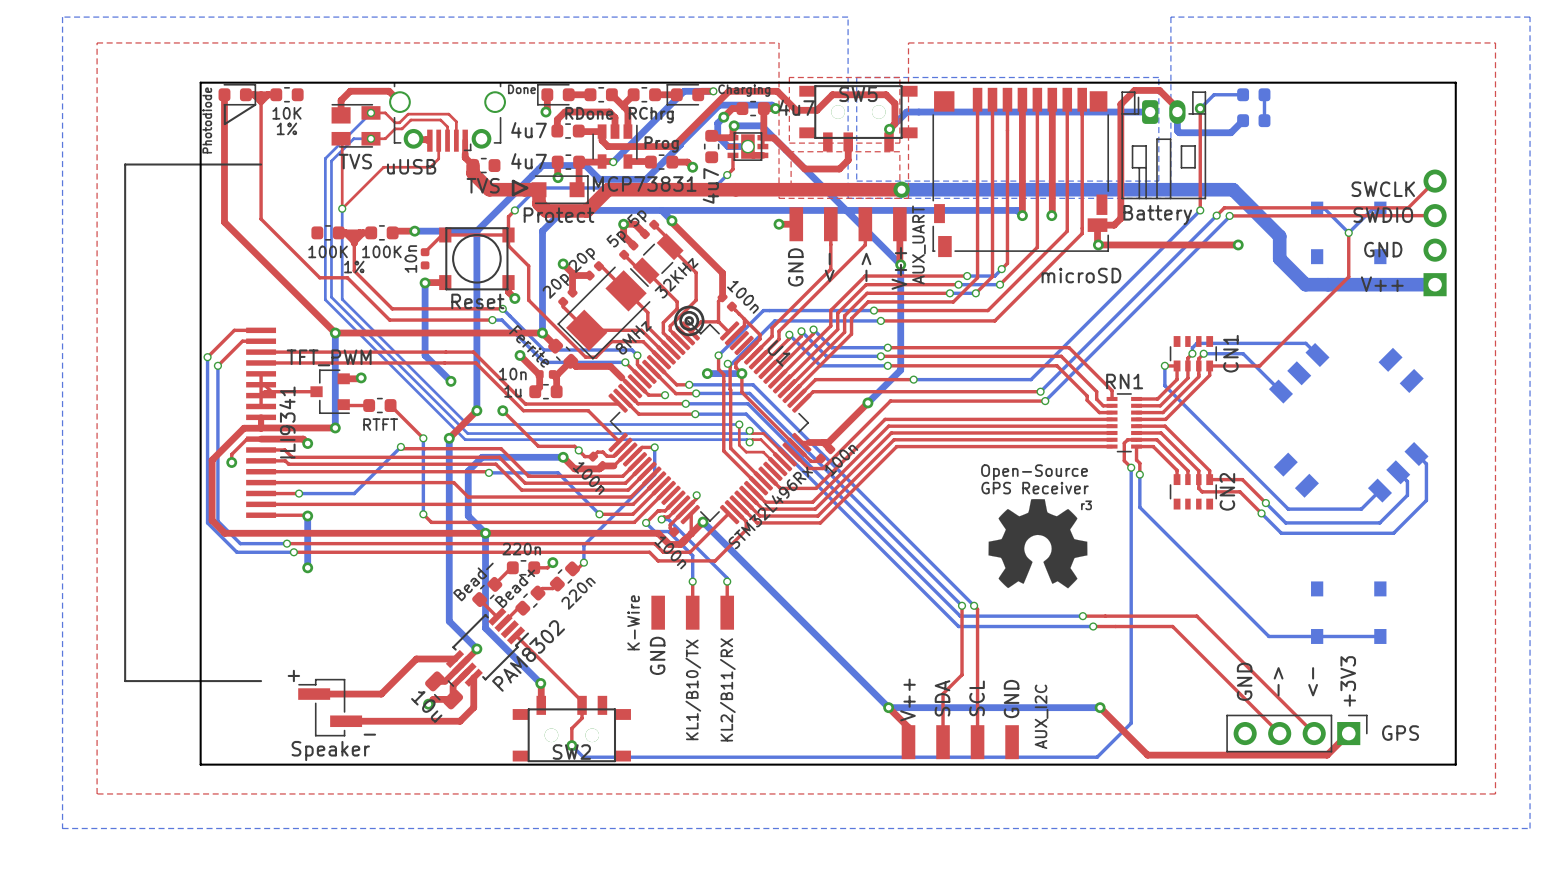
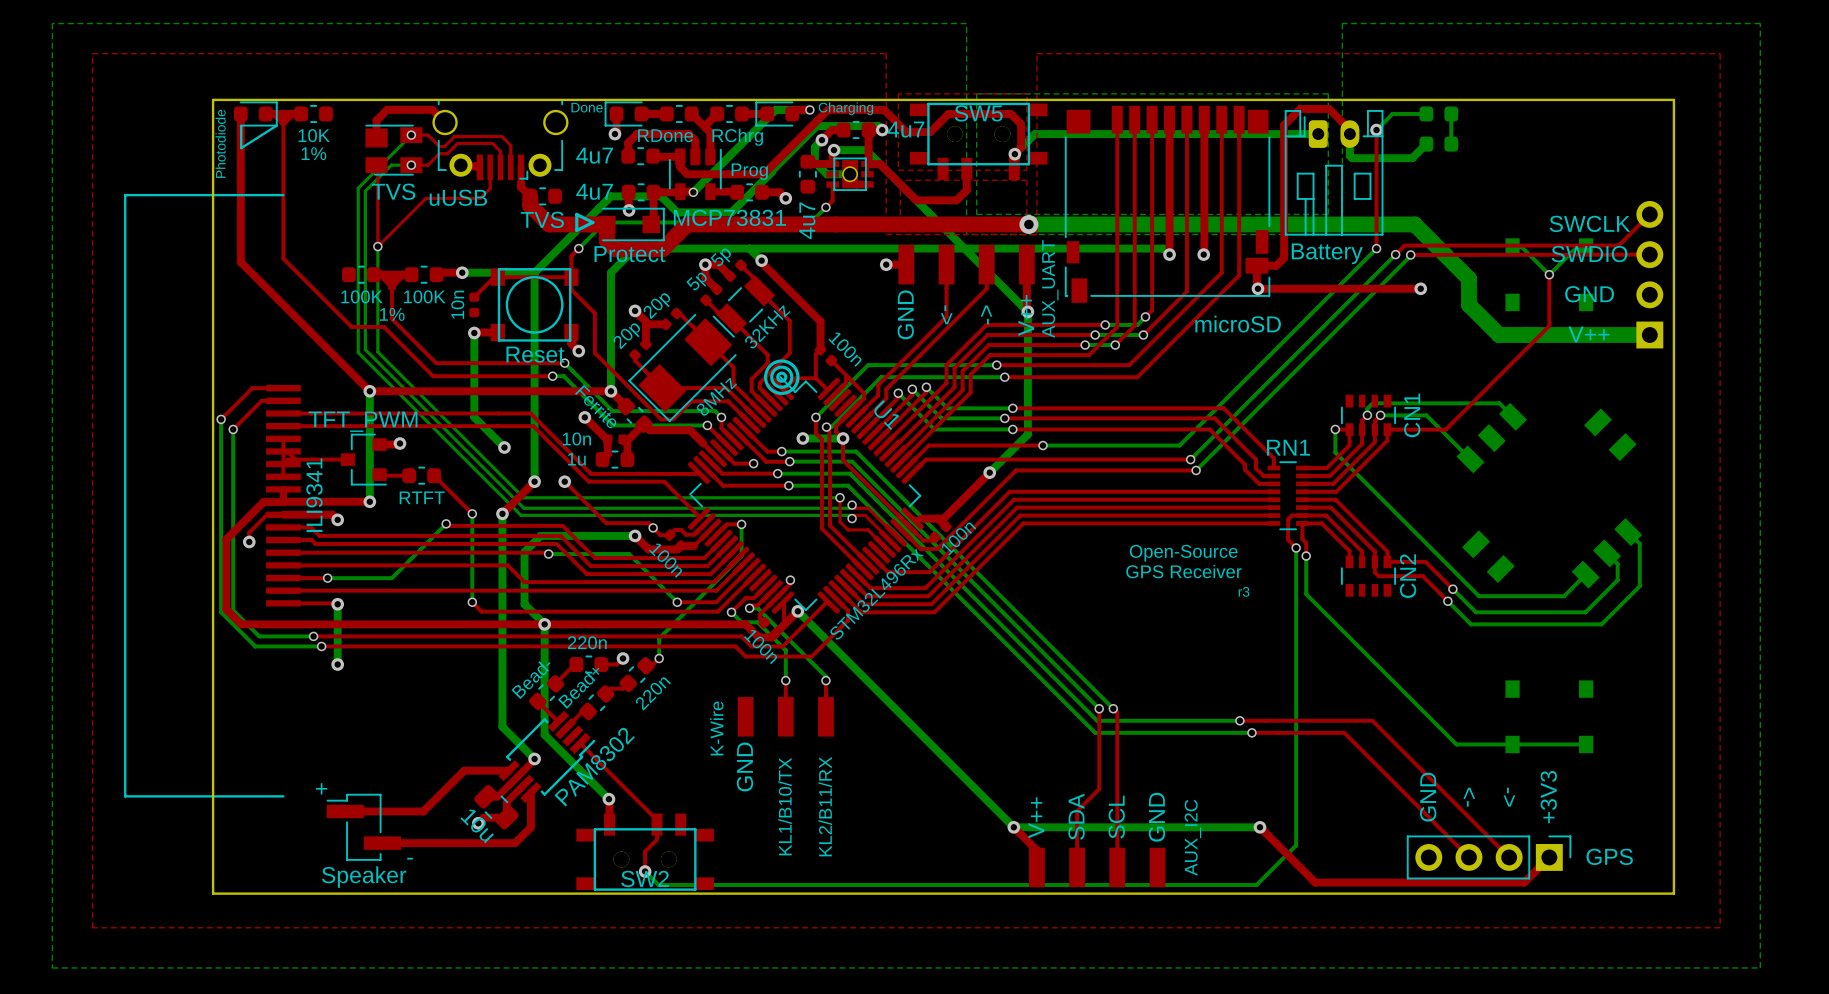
drawing: [988, 499, 1088, 589] -> none

